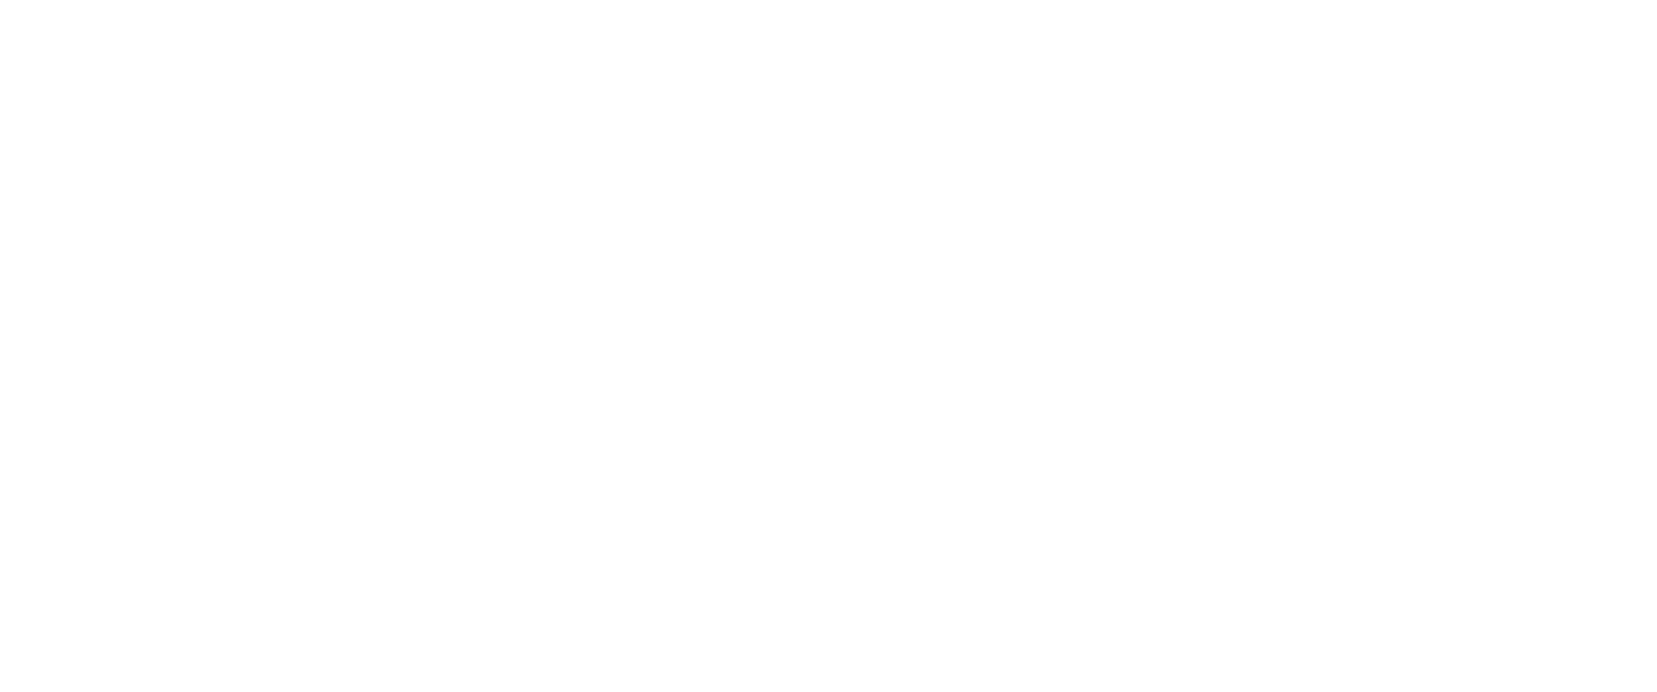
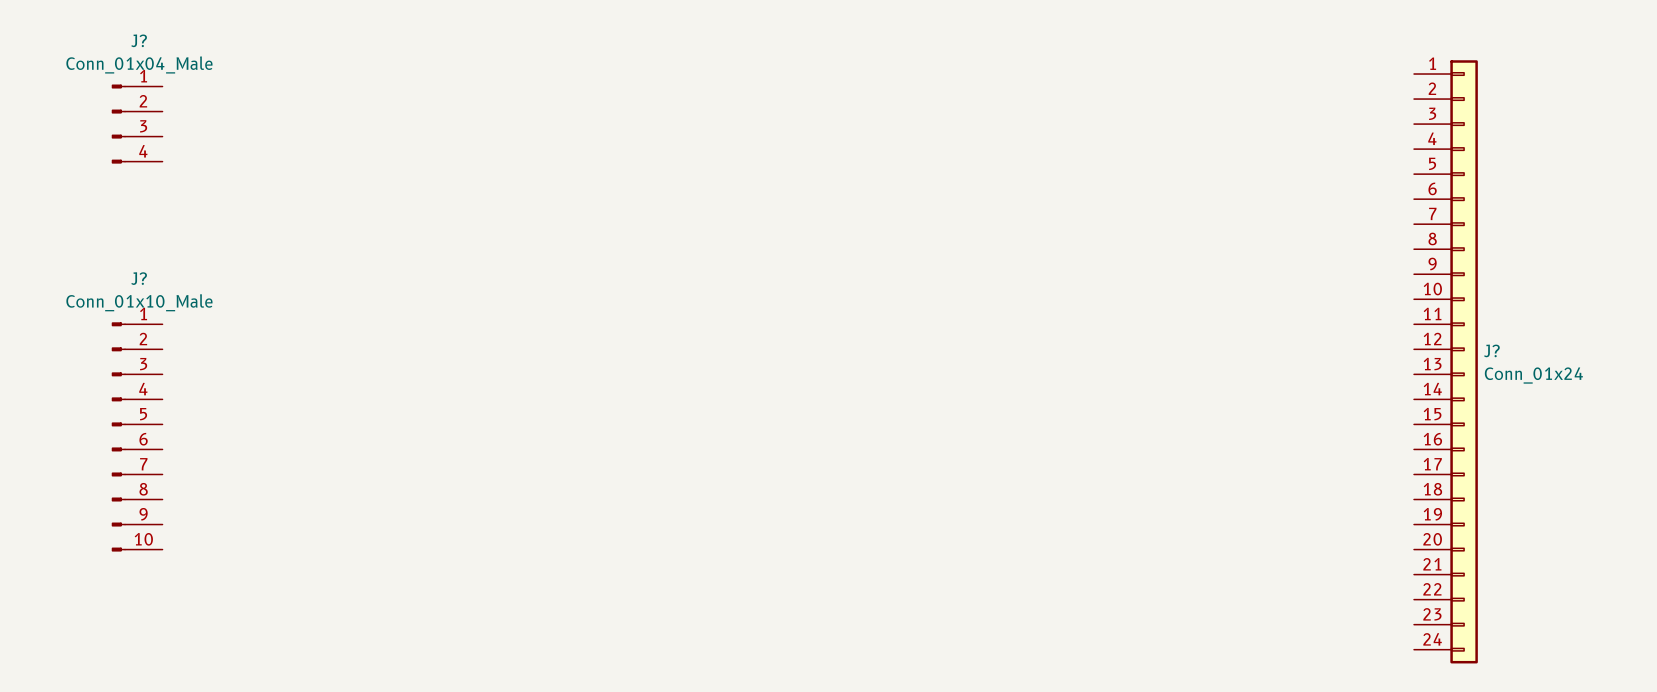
J?: none -> Conn_01x04_Male (137, 124)
J?: none -> Conn_01x24 (1445, 361)
J?: none -> Conn_01x10_Male (137, 436)

